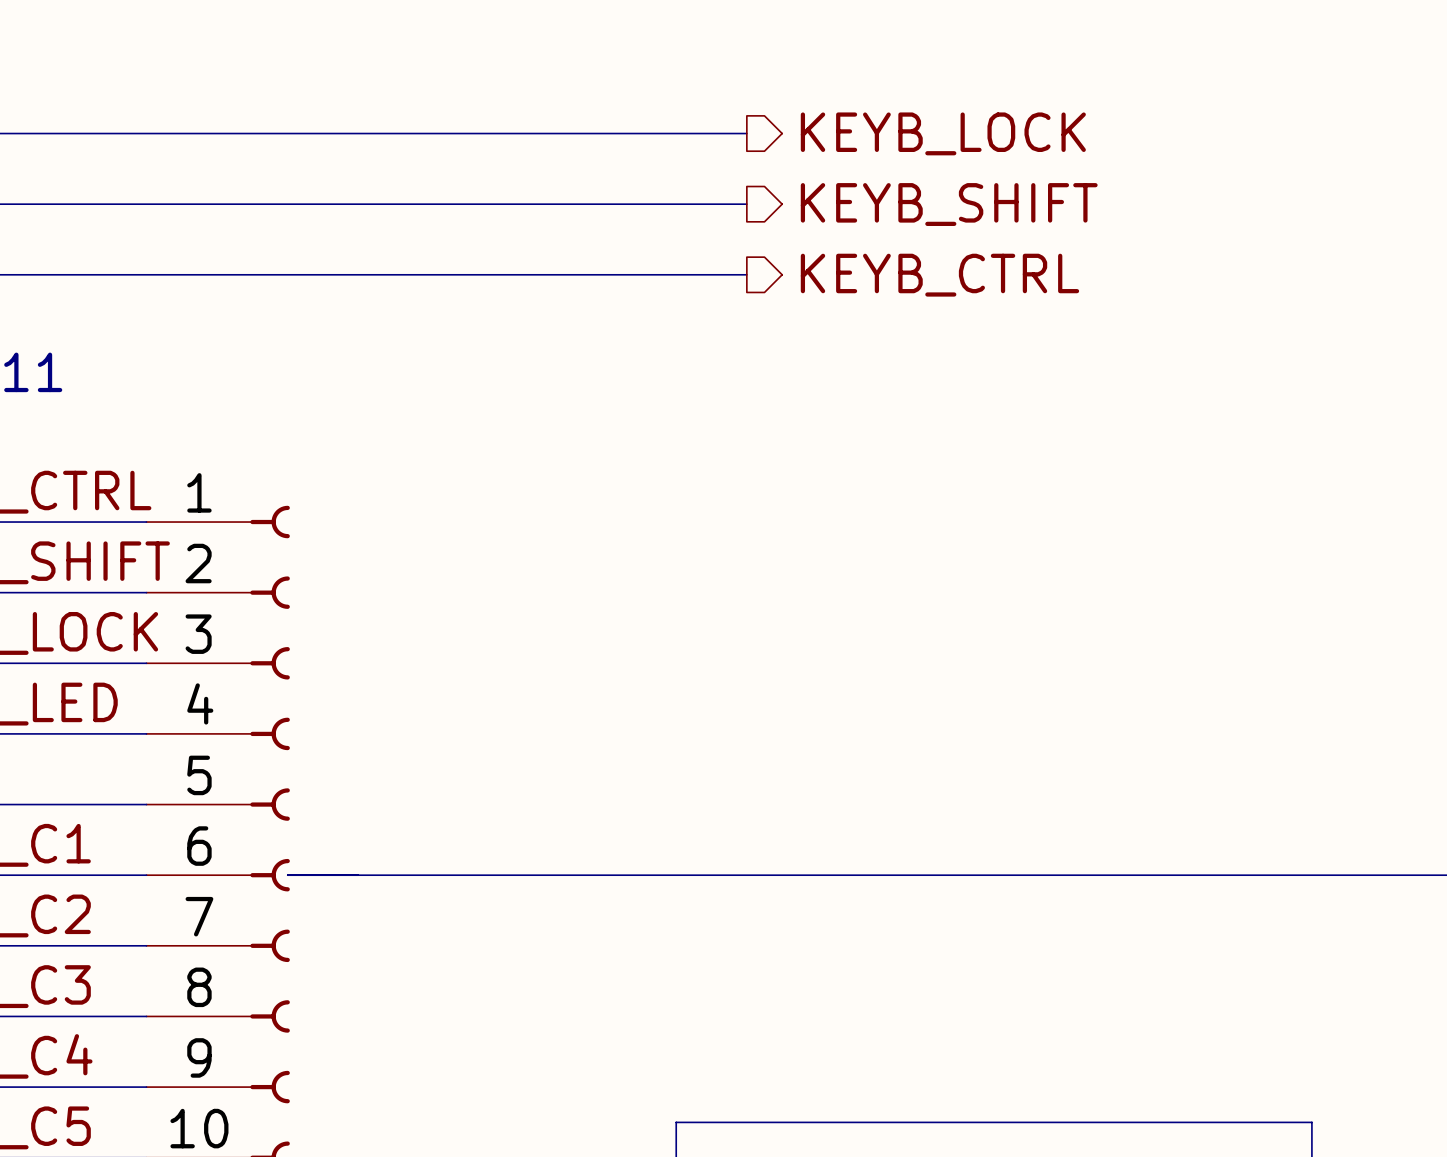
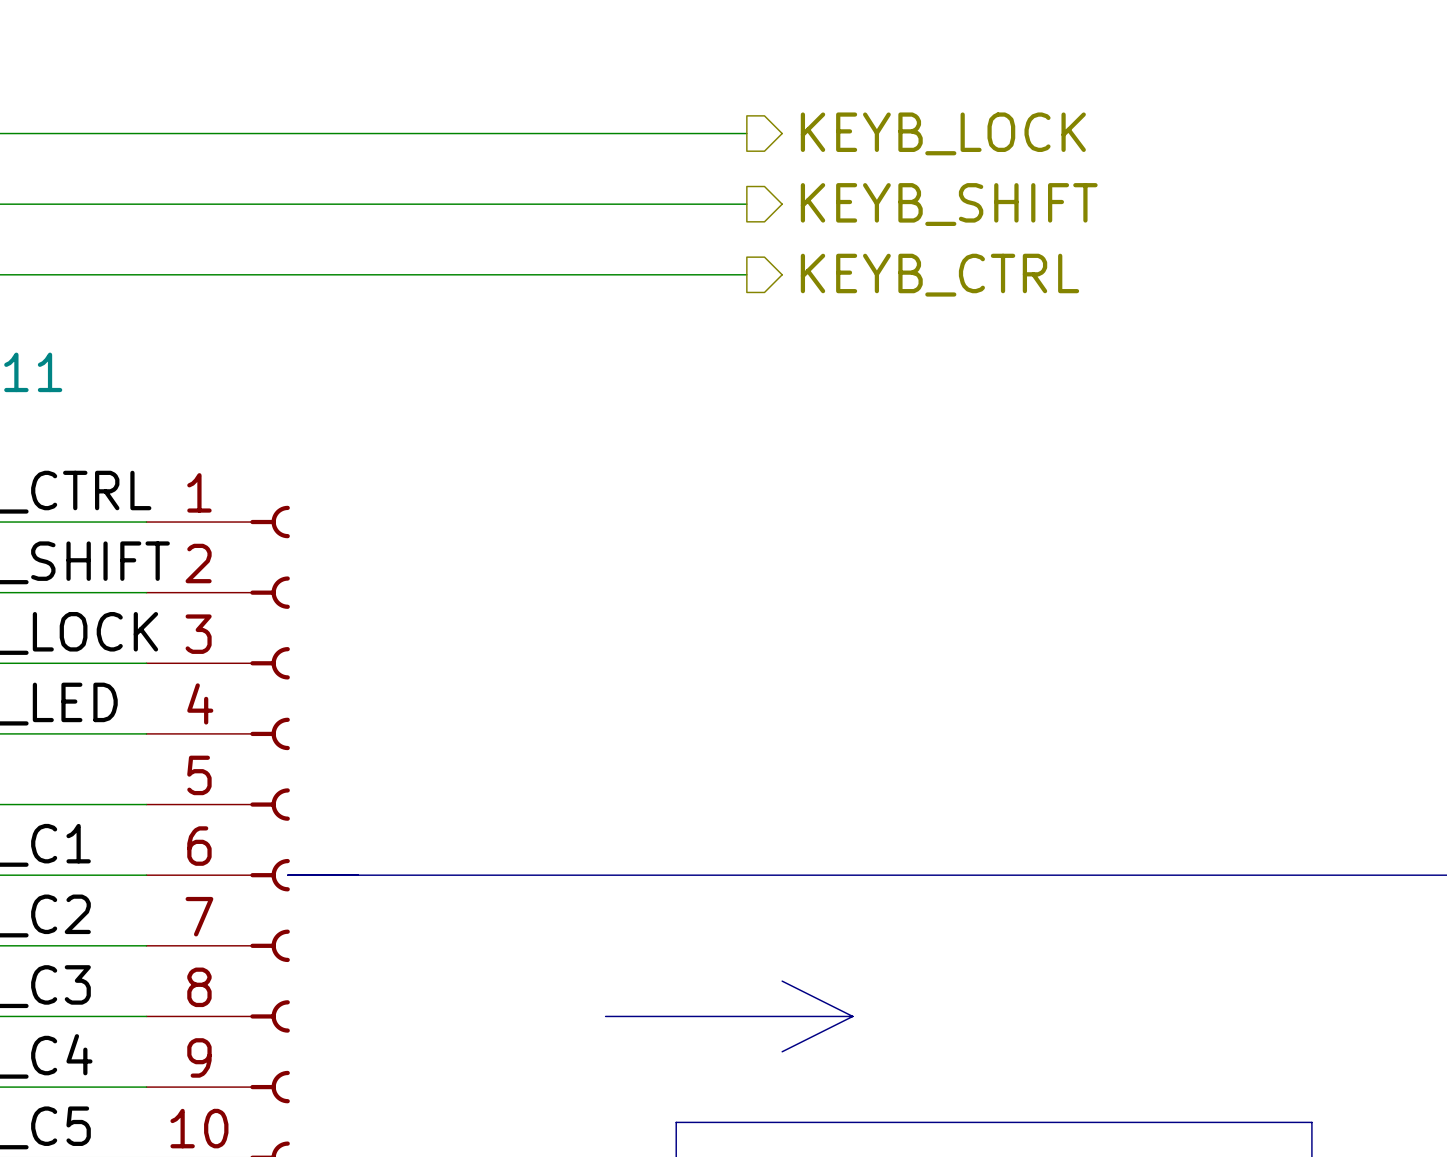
line: none -> (782, 981) (852, 1016)
line: none -> (605, 1016) (852, 1016)
line: none -> (852, 1016) (782, 1051)

